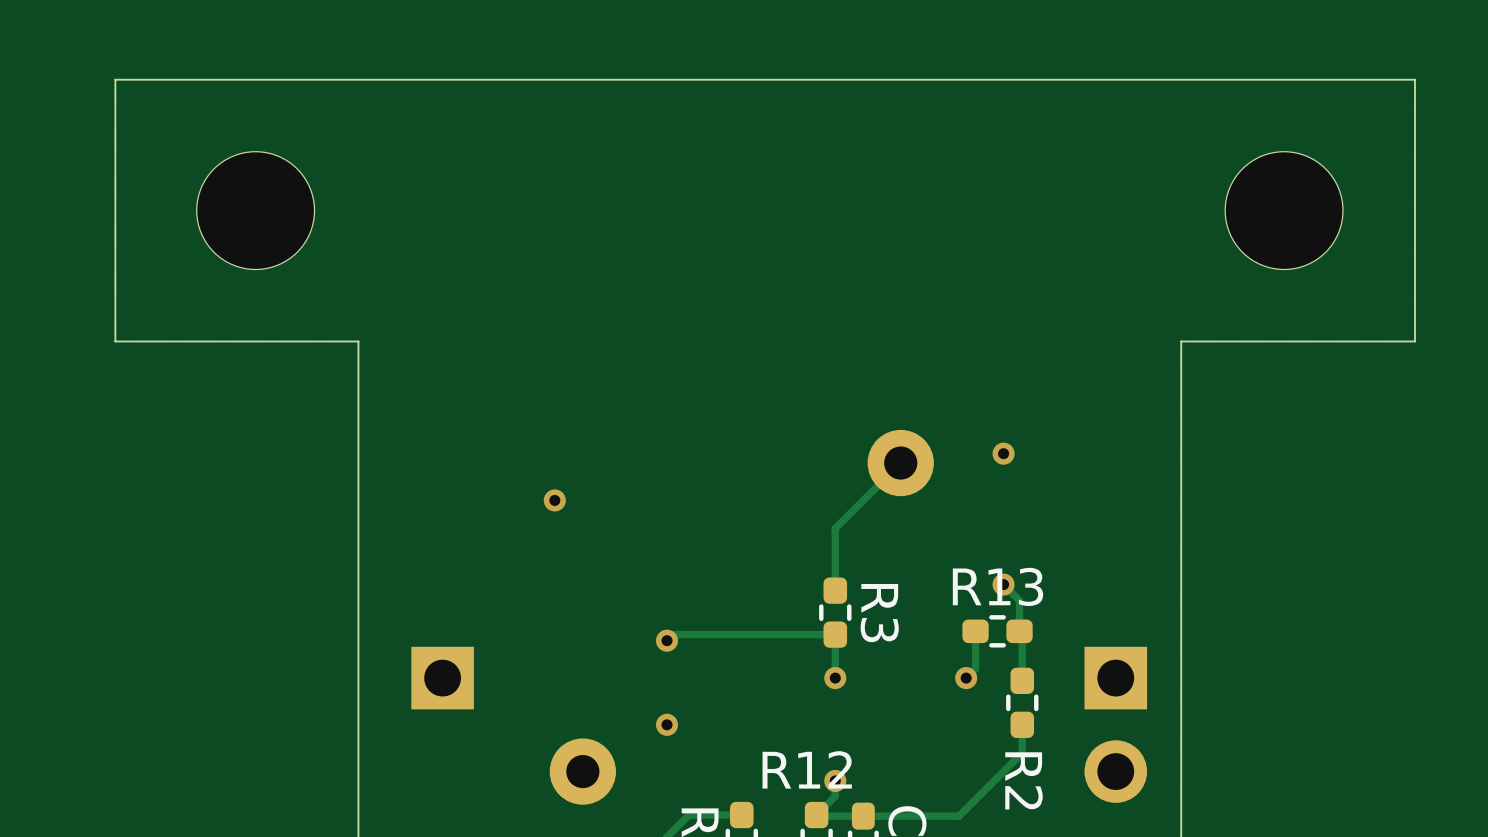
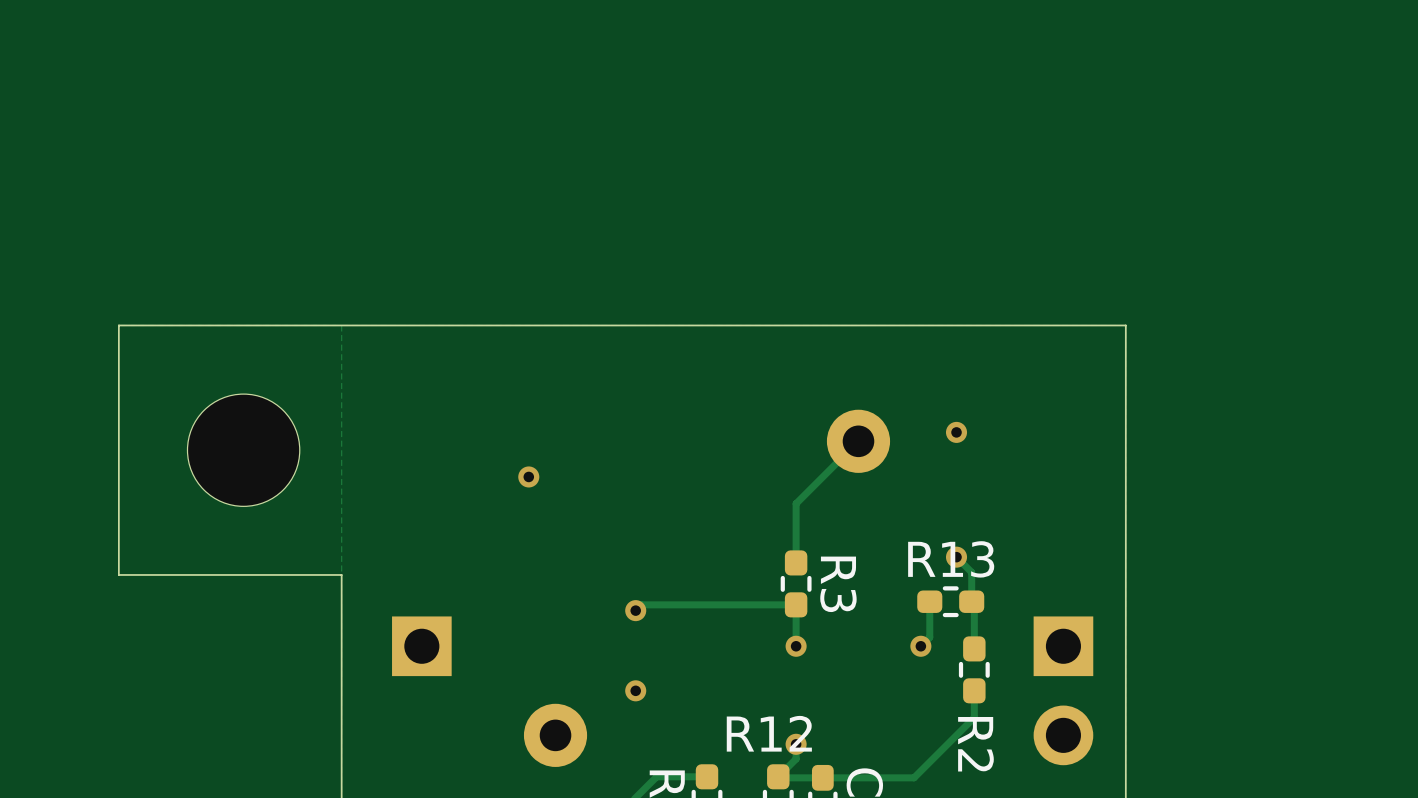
part position: (255, 210) -> (243, 450)
part: (1284, 210) -> none
board edge: (358, 341) (358, 603) -> (118, 325) (118, 574) (341, 574)
board edge: (1181, 341) (1414, 341) (1414, 79) (115, 79) (115, 341) (124, 341) -> (1125, 325) (341, 325)

